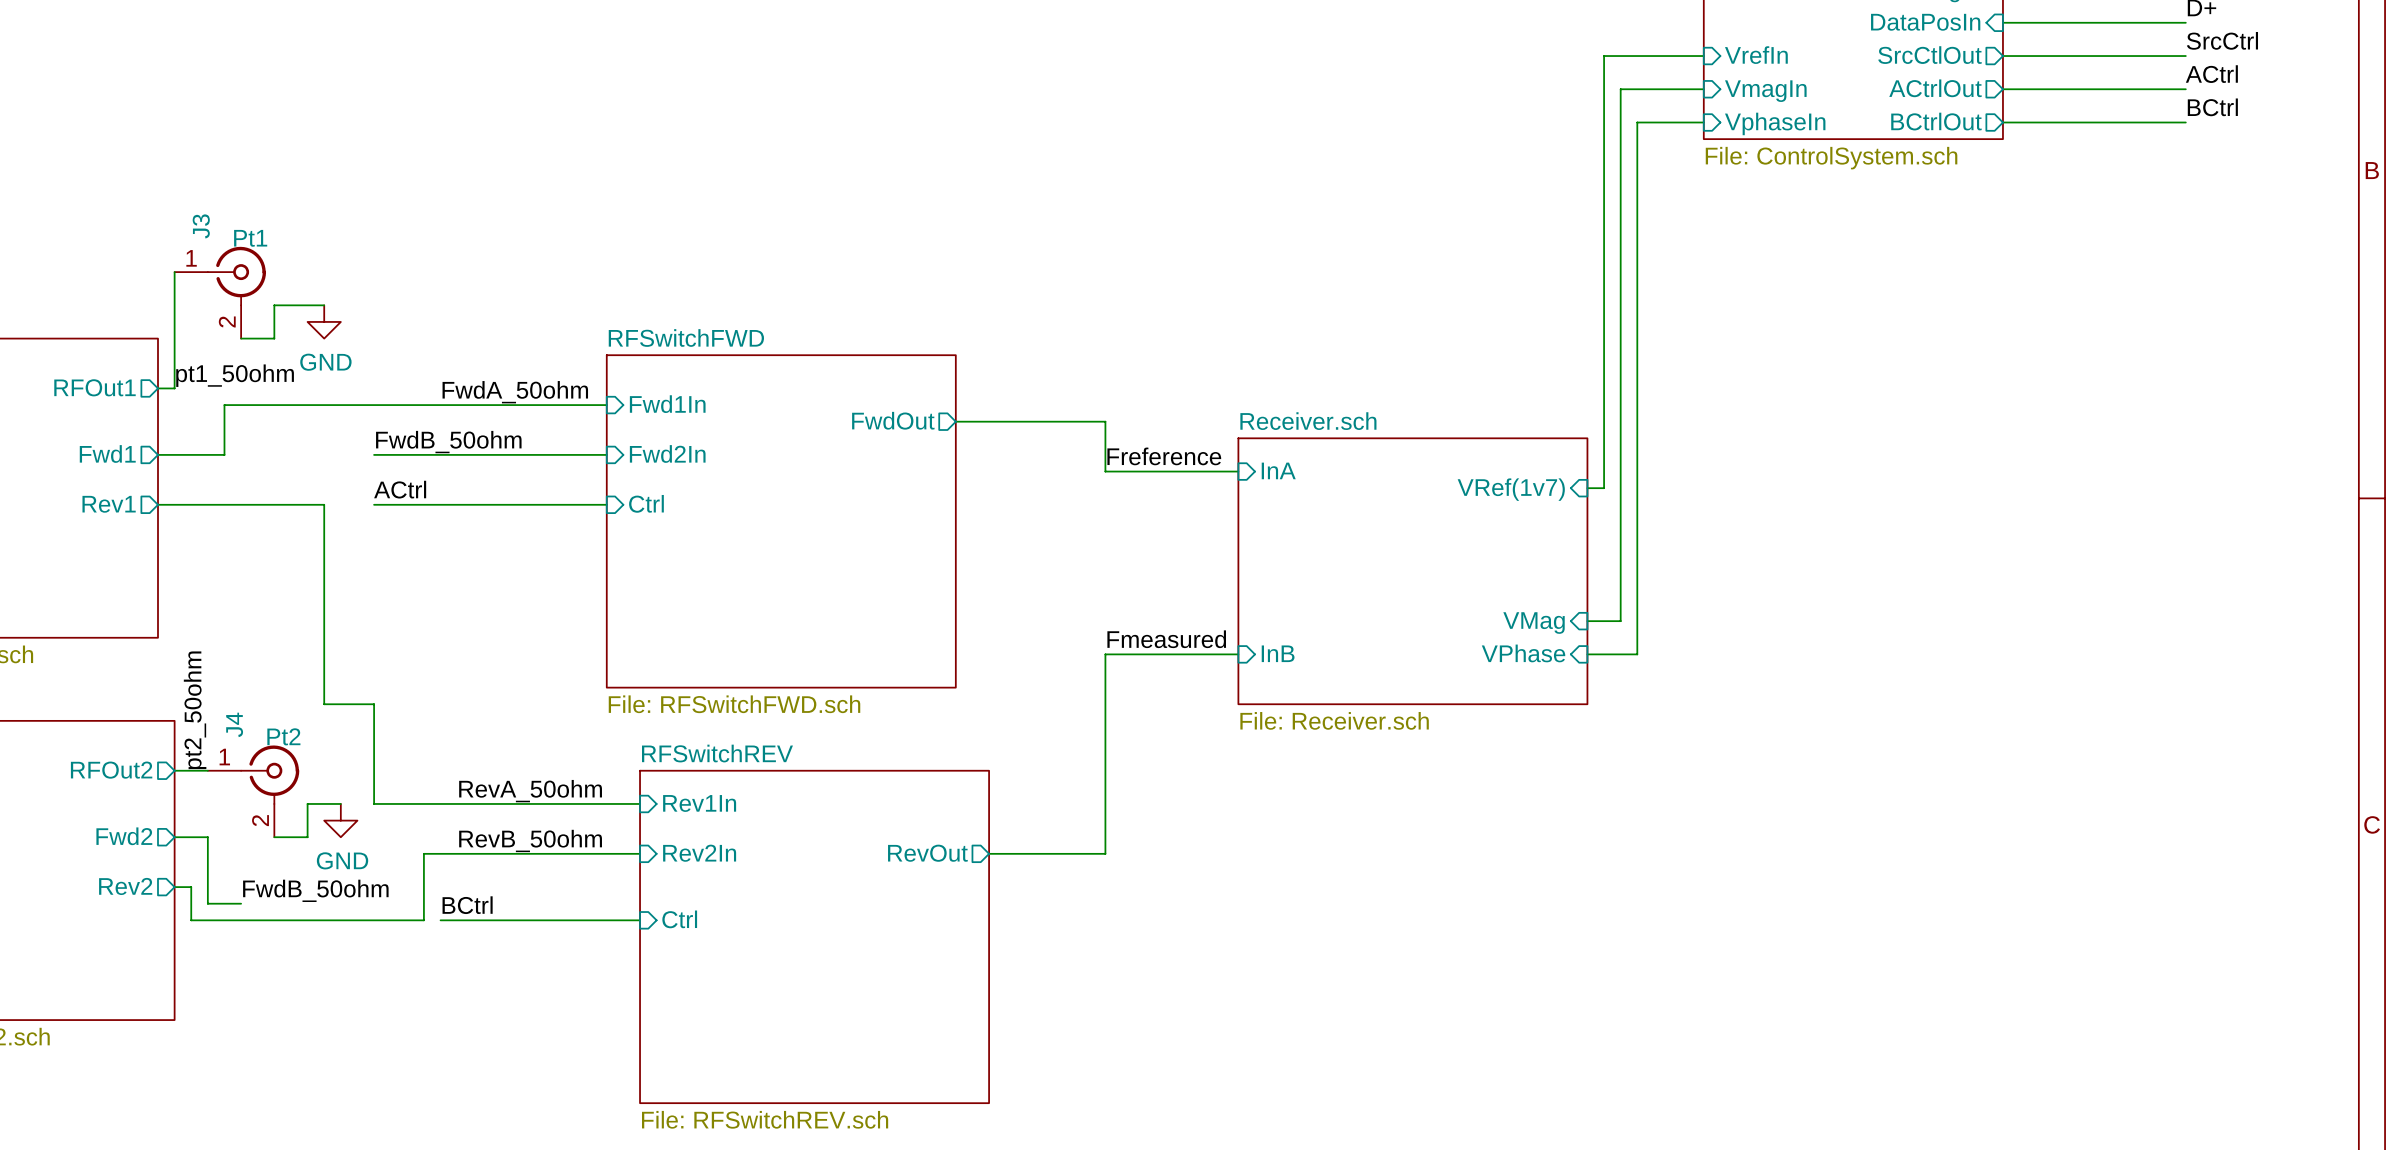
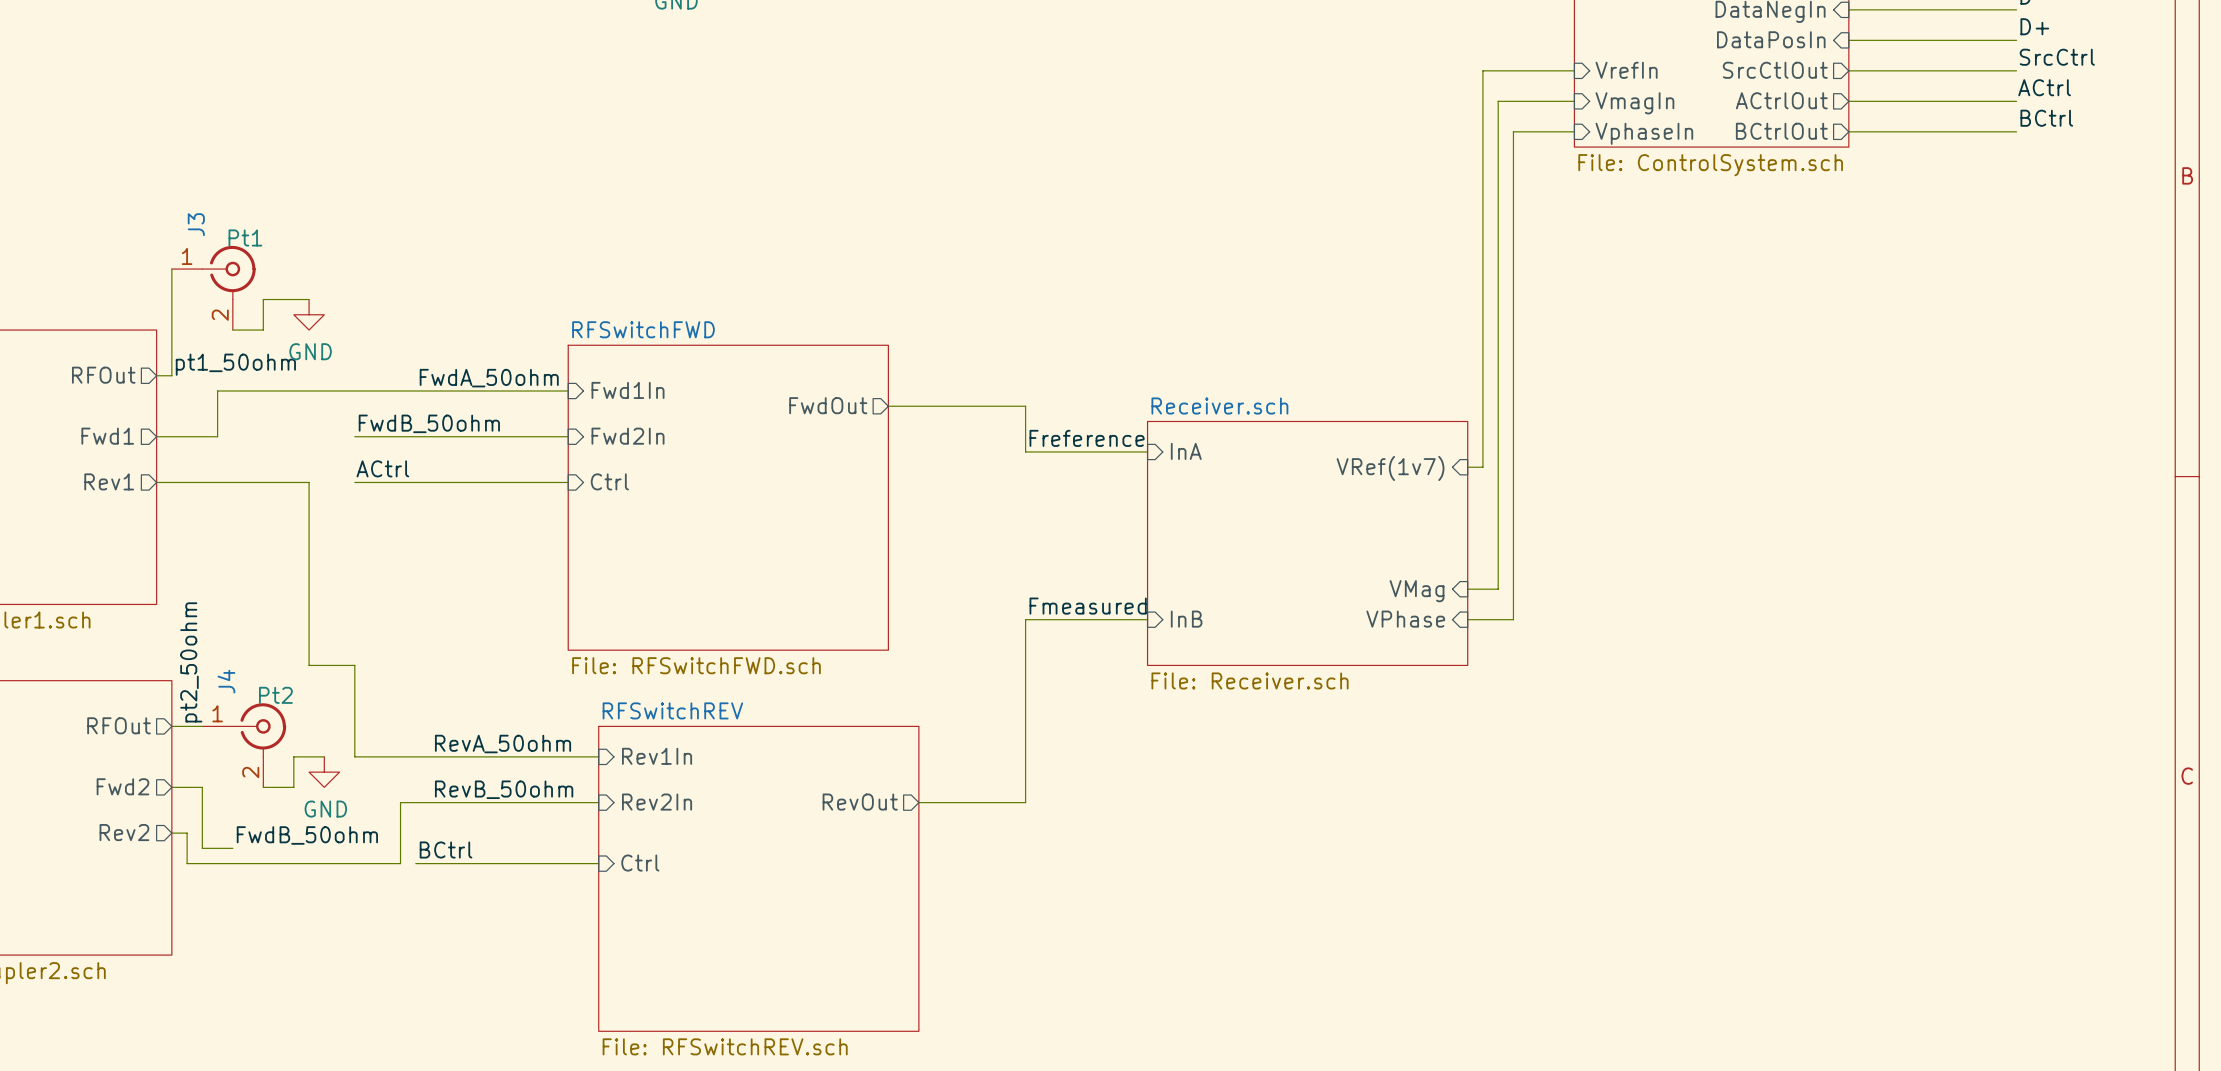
sheet pin: RFOut1 (94, 387) -> RFOut (103, 375)
sheet pin: RFOut2 (111, 770) -> RFOut (118, 725)

